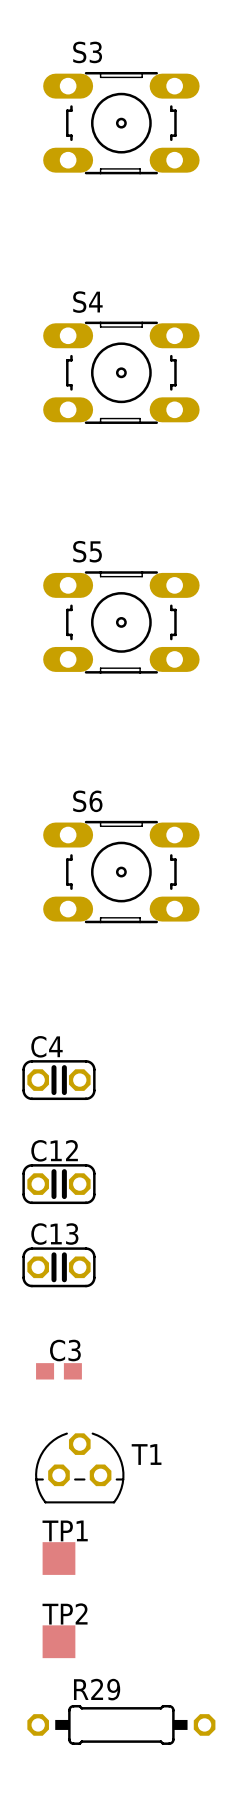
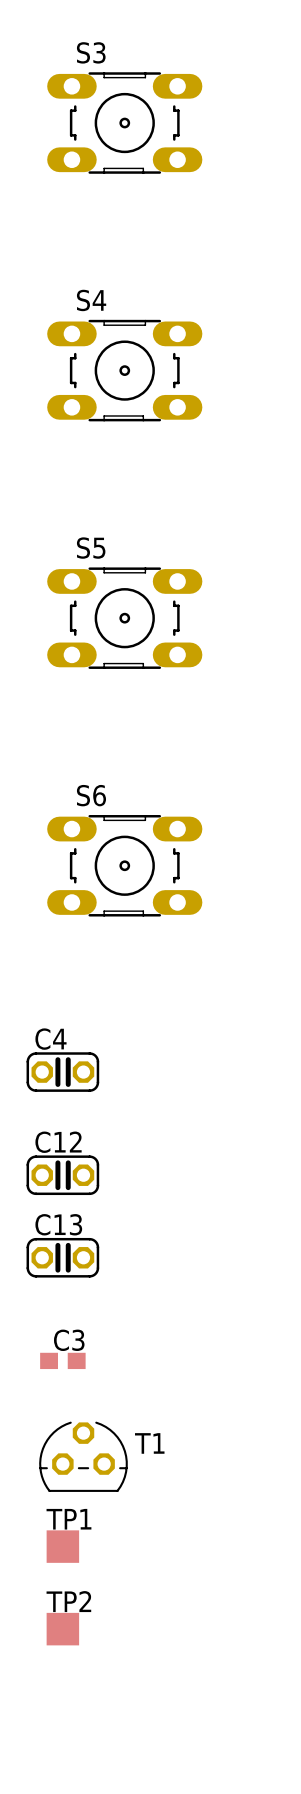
R29: (121, 1724) -> none

